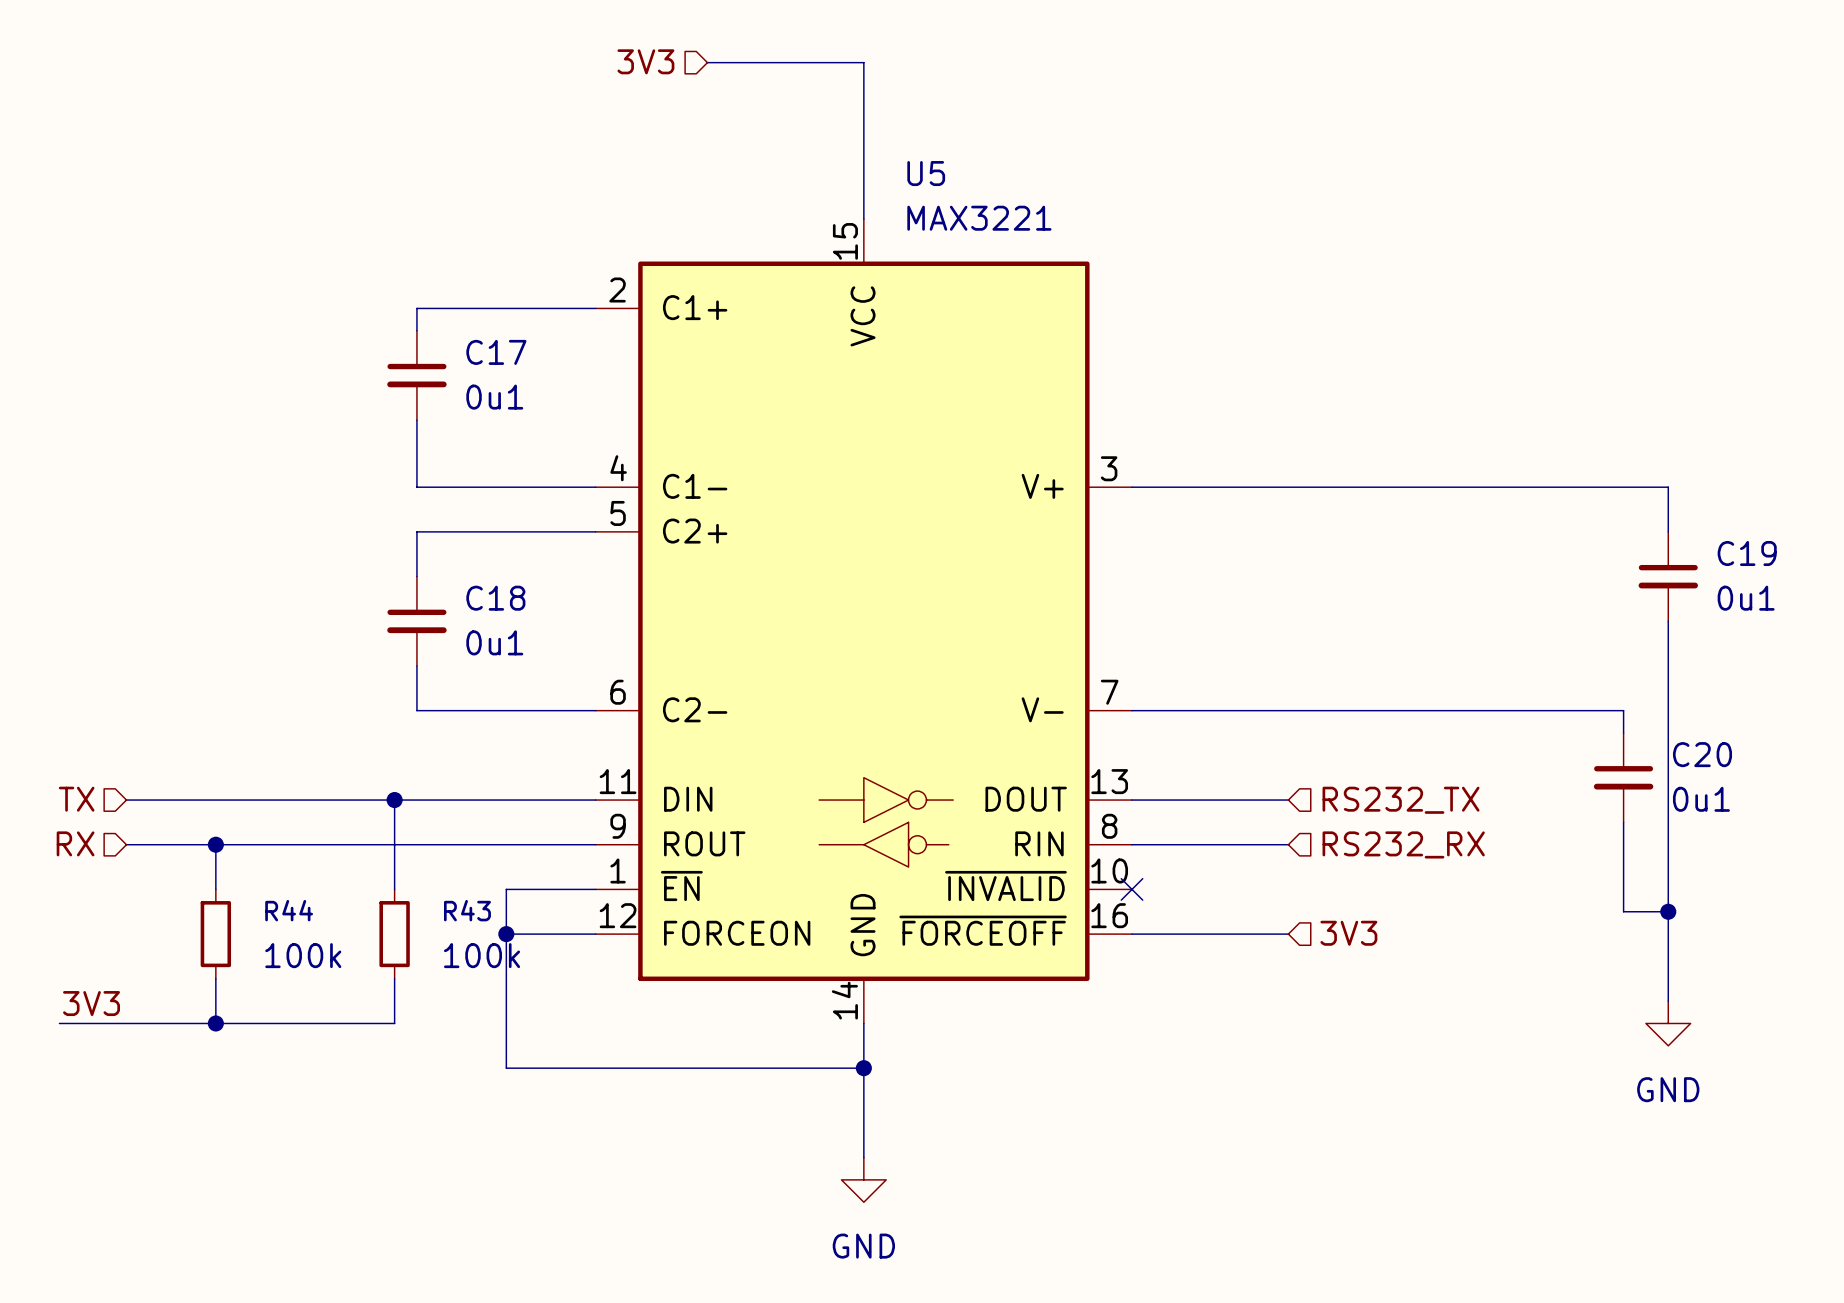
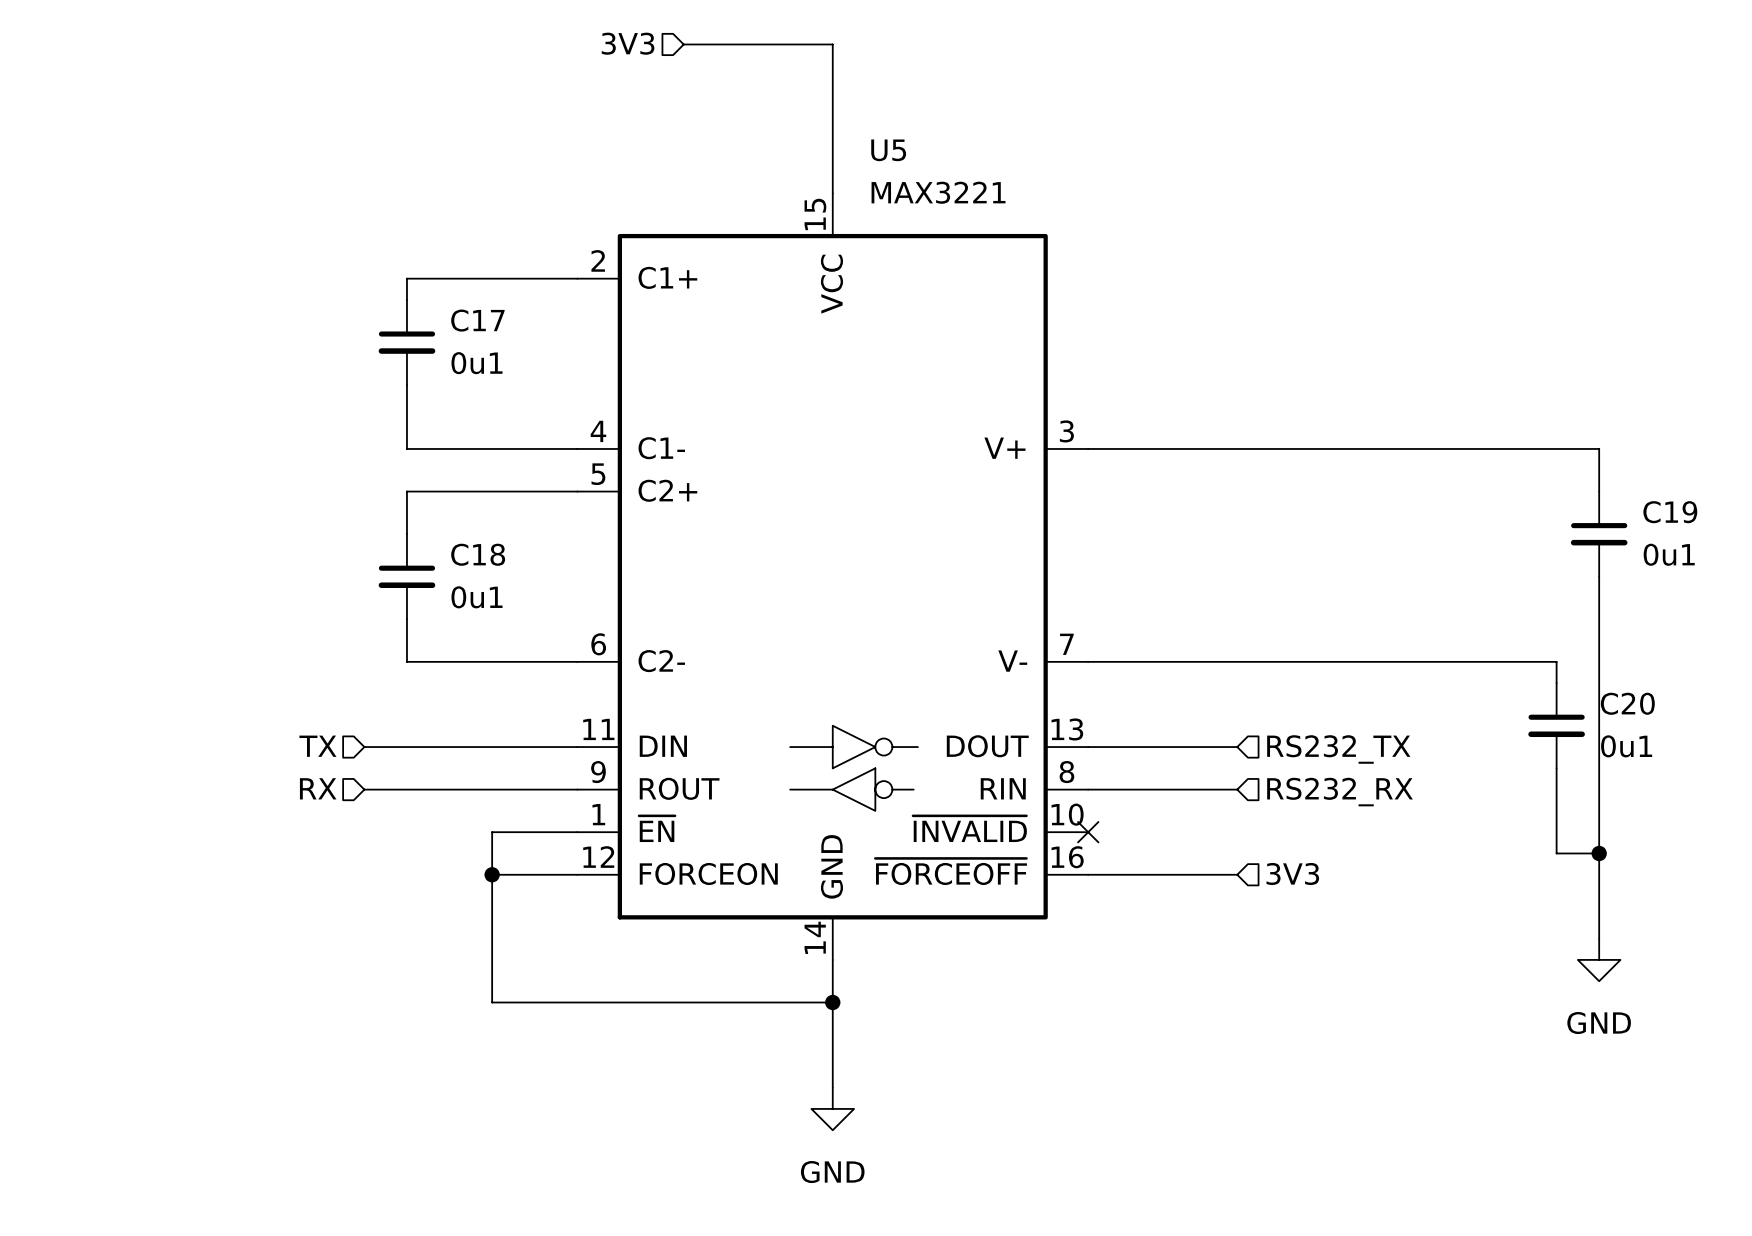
hierarchical label position: TX (76, 799) -> TX (317, 746)
wire: (126, 800) (372, 800) -> none
wire: (394, 800) (394, 889) -> none
junction: (394, 800) -> none
hierarchical label position: RX (75, 843) -> RX (318, 788)
wire: (126, 844) (372, 844) -> none
wire: (215, 844) (215, 889) -> none
junction: (215, 844) -> none
R44: 100k (215, 934) -> none
R43: 100k (394, 934) -> none
wire: (215, 978) (215, 1023) -> none
wire: (394, 978) (394, 1023) (59, 1023) -> none
label: 3V3 (91, 1003) -> none
junction: (215, 1023) -> none

